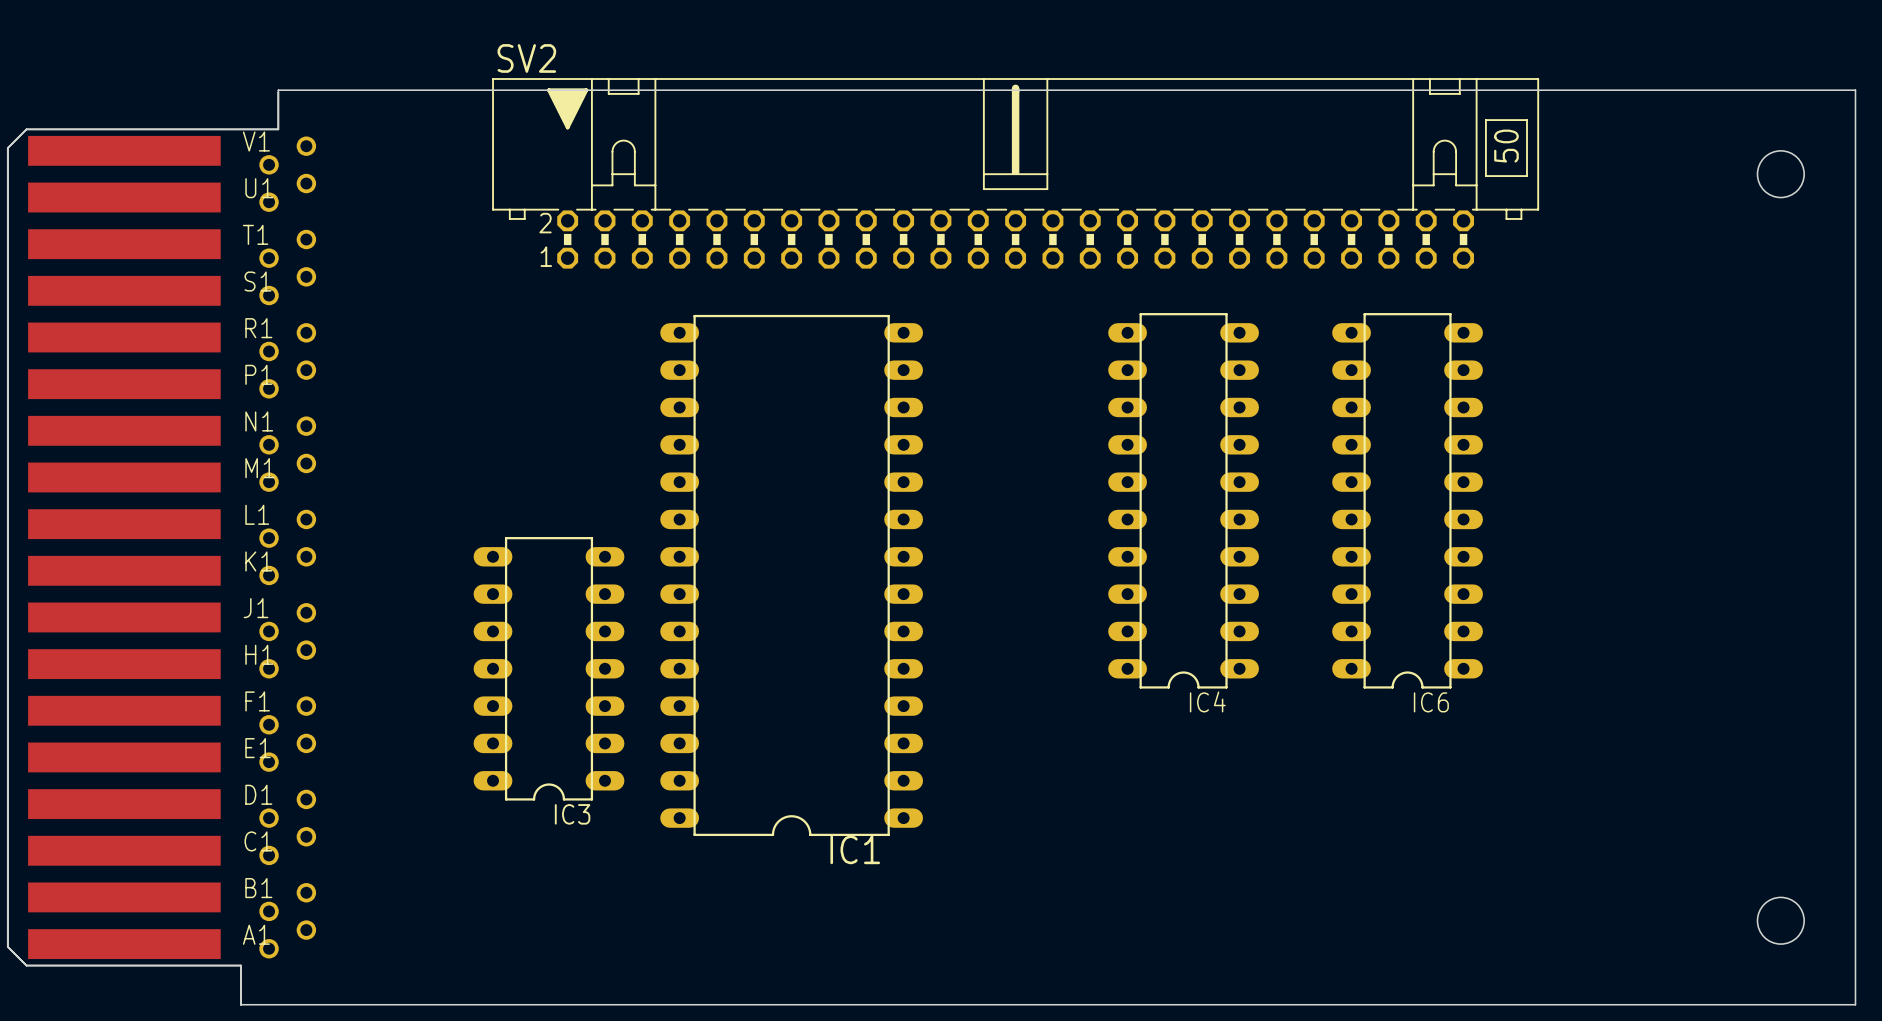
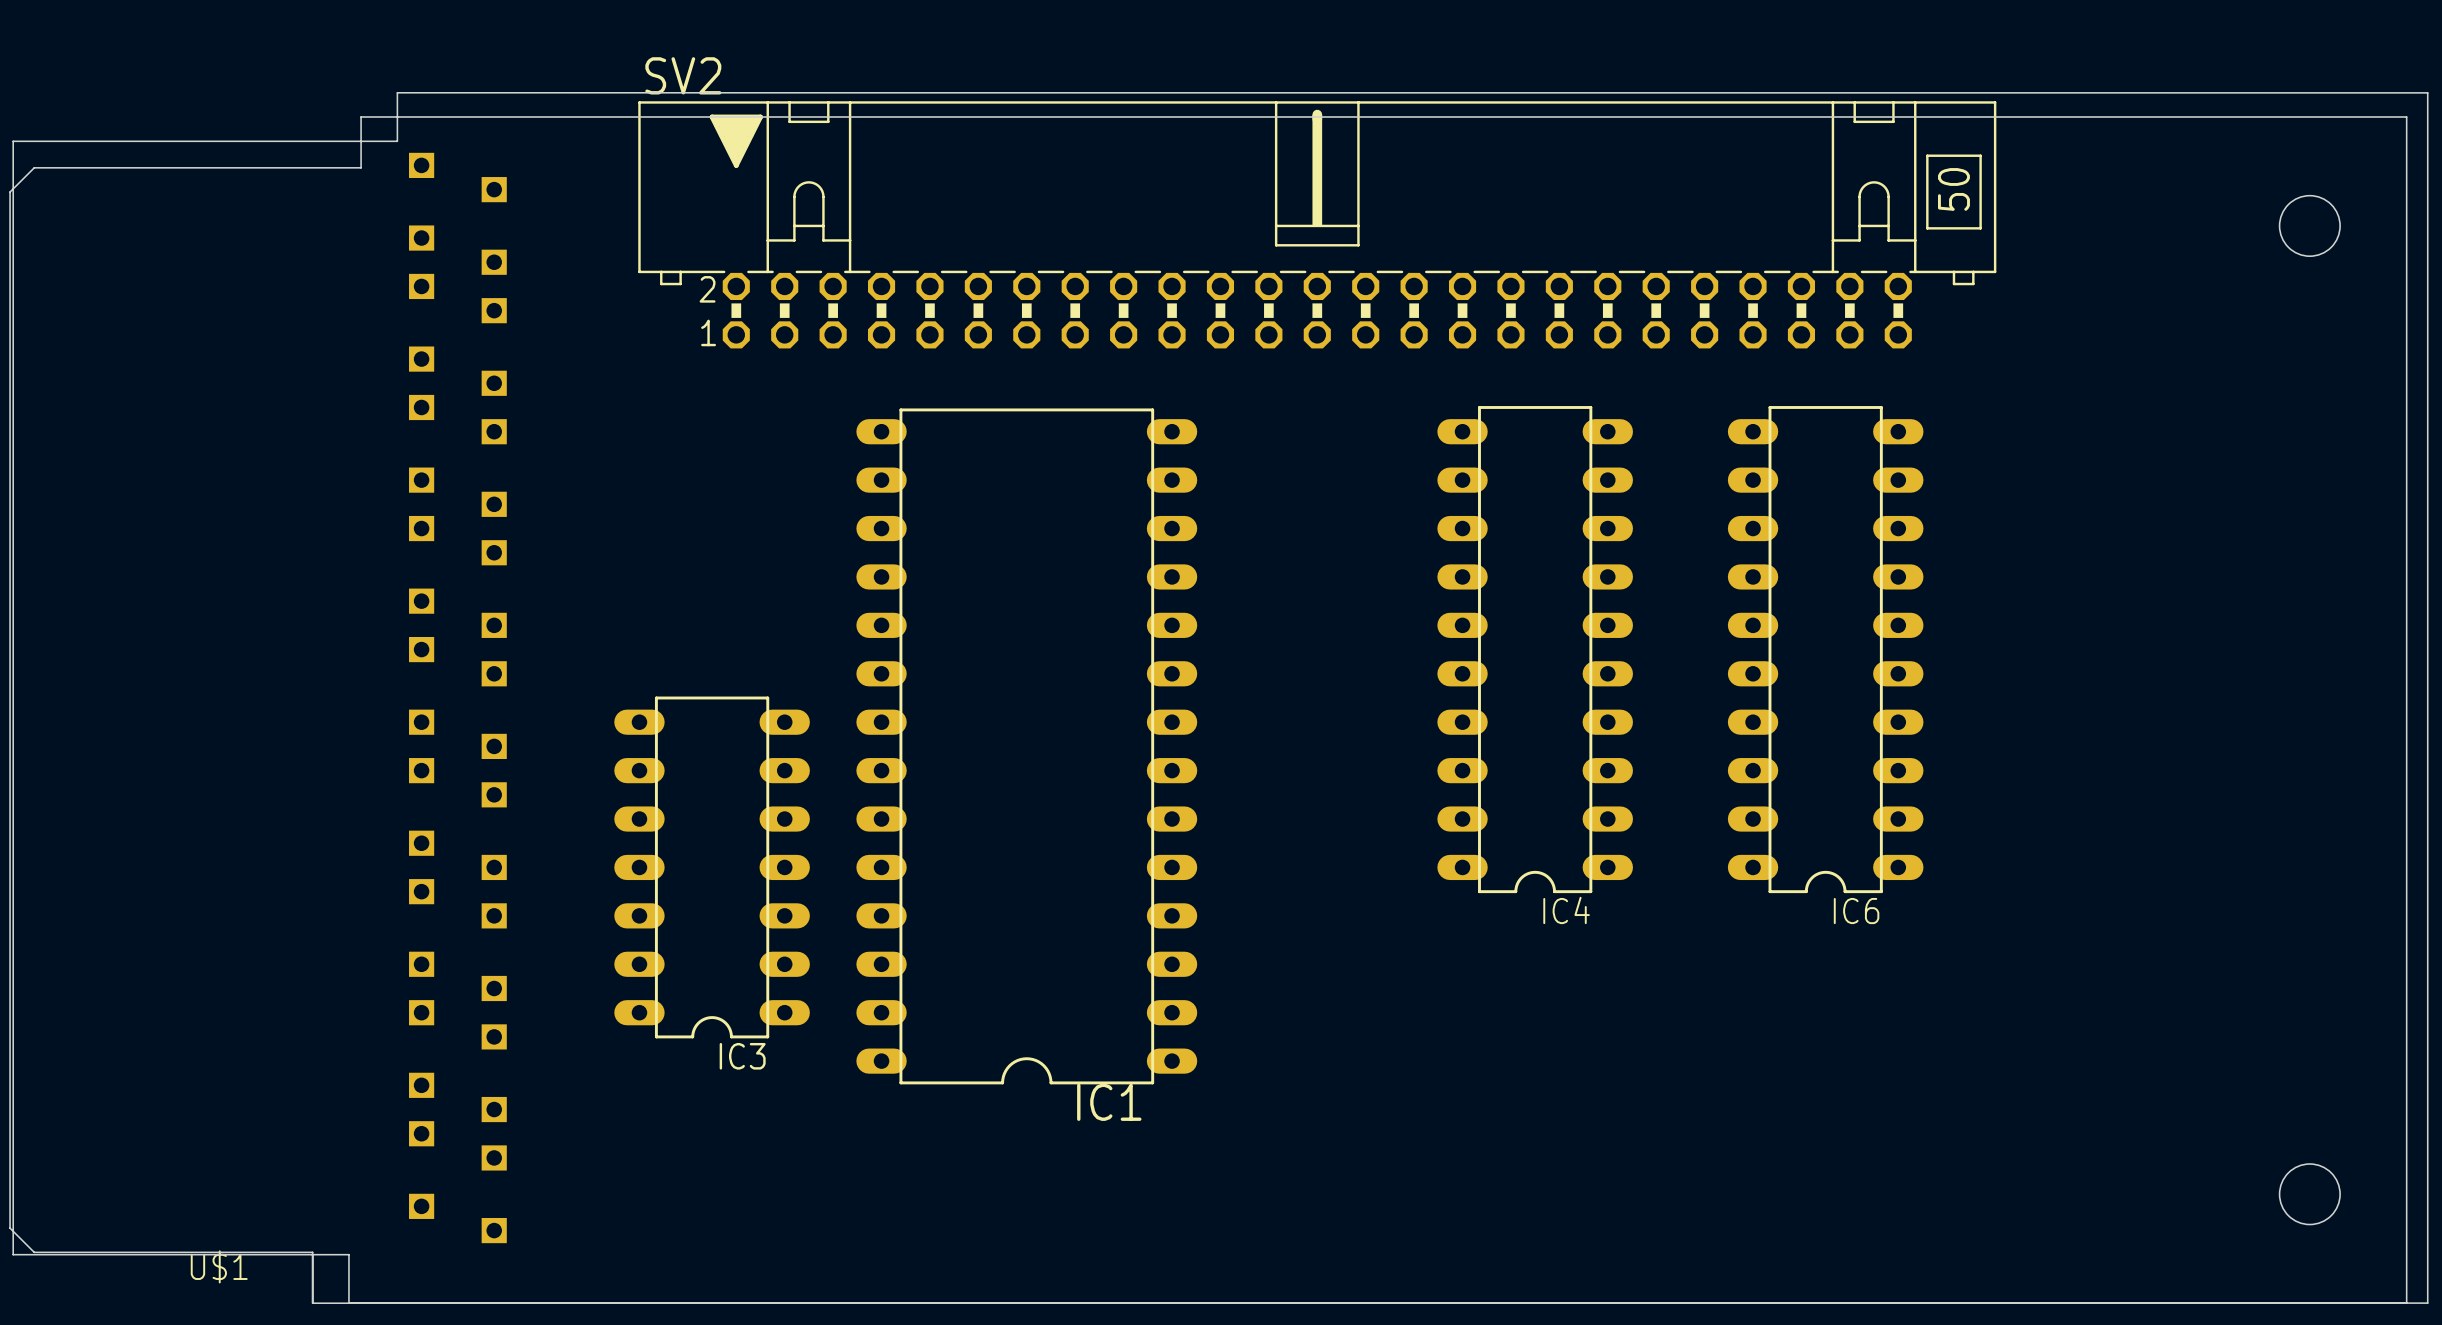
board edge: none -> (397, 92) (2427, 92) (2427, 1303) (348, 1303) (348, 1254) (13, 1254) (13, 141) (397, 141) (397, 92)
U$1: none -> (457, 697)
part: (287, 547) -> none
part: (143, 548) -> none

